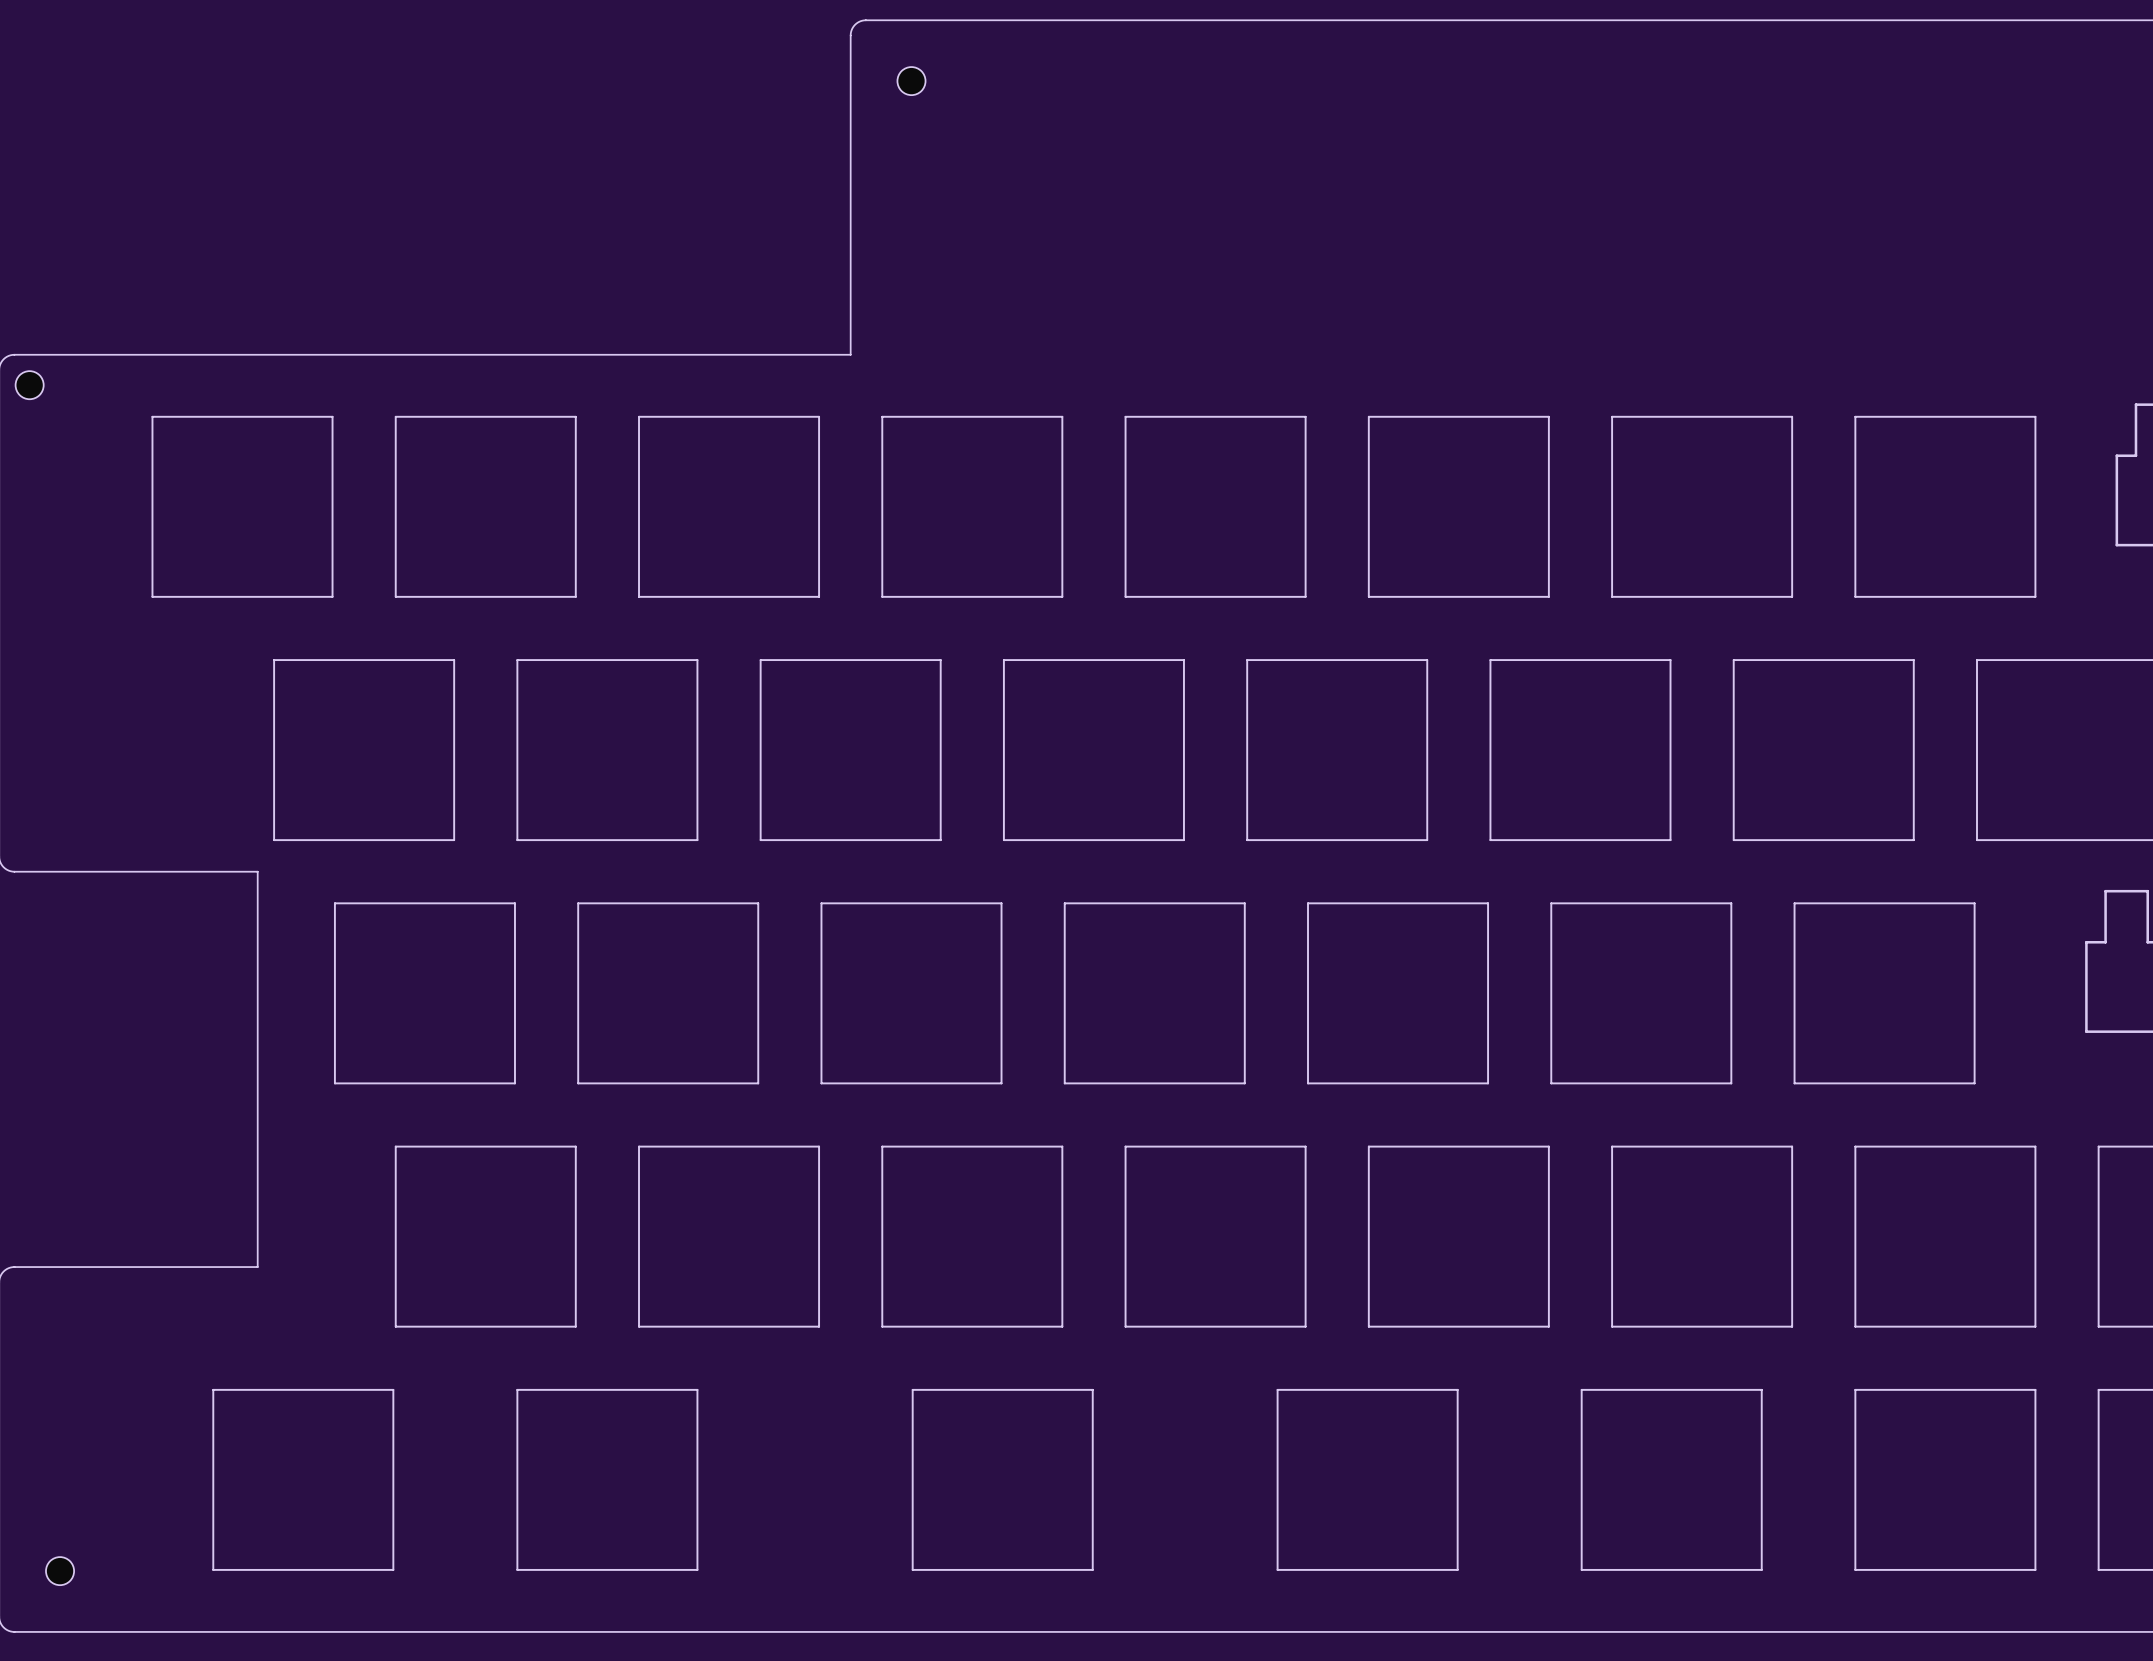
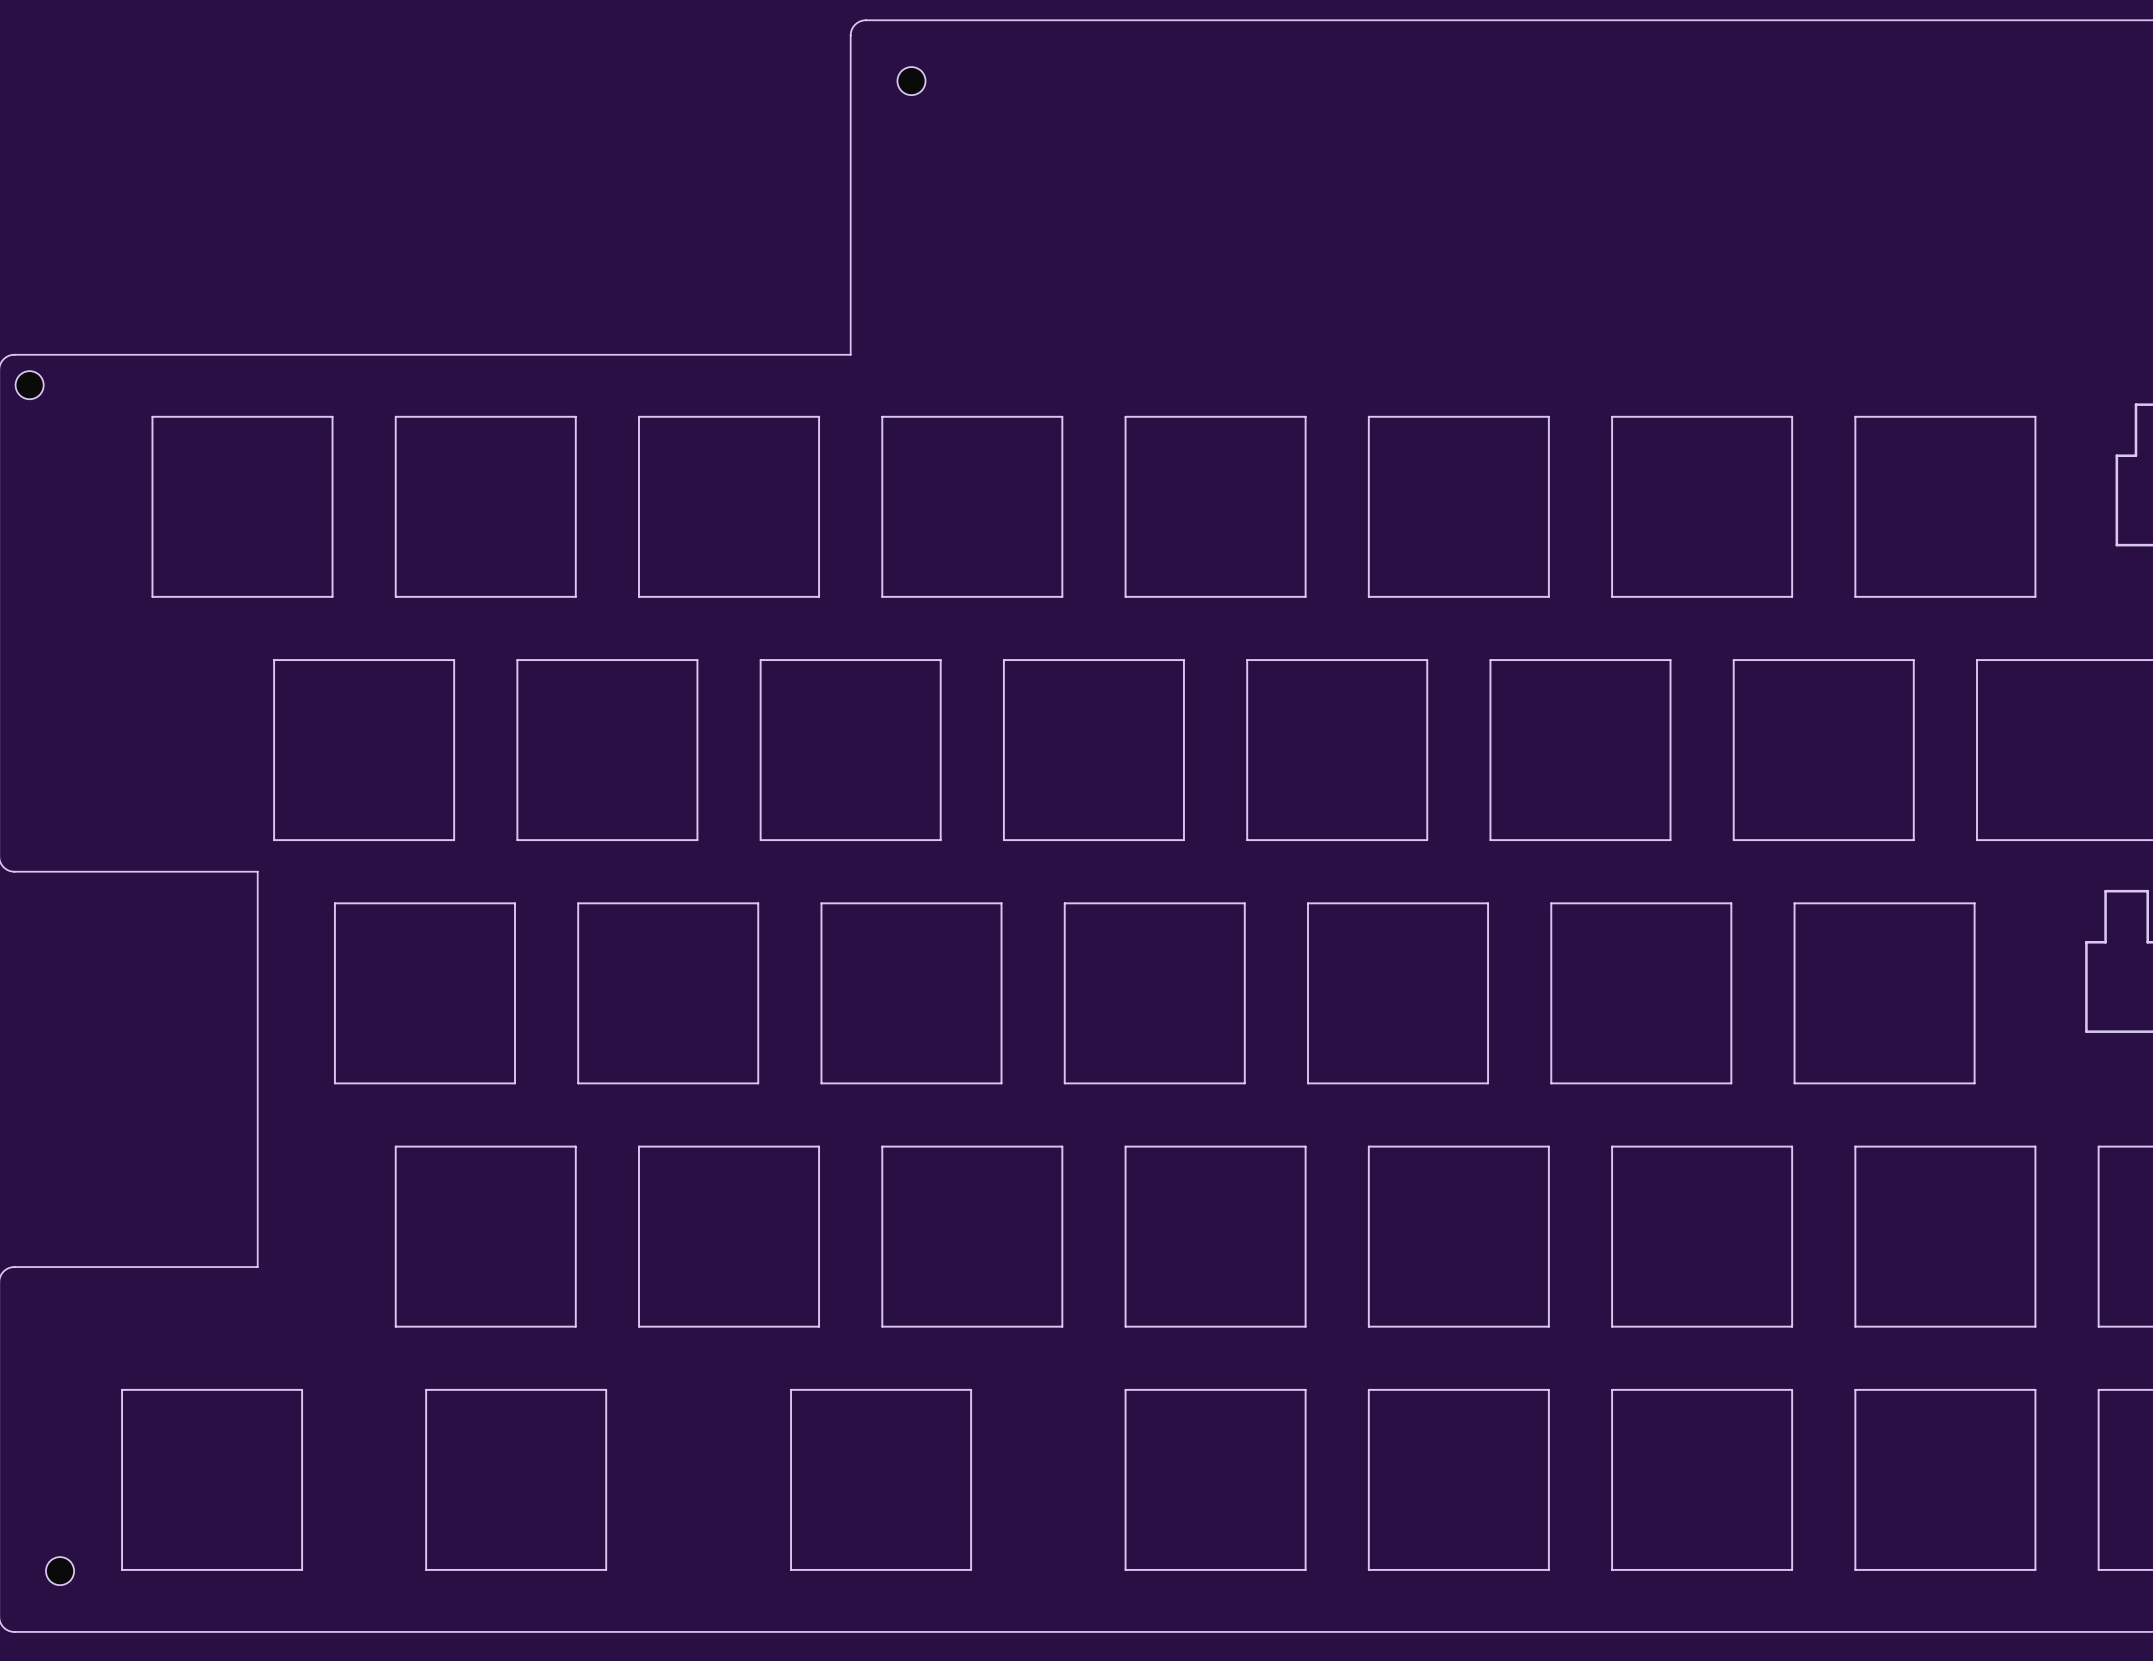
drawing: none -> [790, 1388, 973, 1571]
drawing: [911, 1388, 1094, 1571] -> none
drawing: none -> [1124, 1388, 1307, 1571]
drawing: [1276, 1388, 1459, 1571] -> none
drawing: none -> [1367, 1388, 1550, 1571]
drawing position: (303, 1479) -> (212, 1479)
drawing position: (607, 1479) -> (516, 1479)
drawing position: (1671, 1479) -> (1702, 1479)

